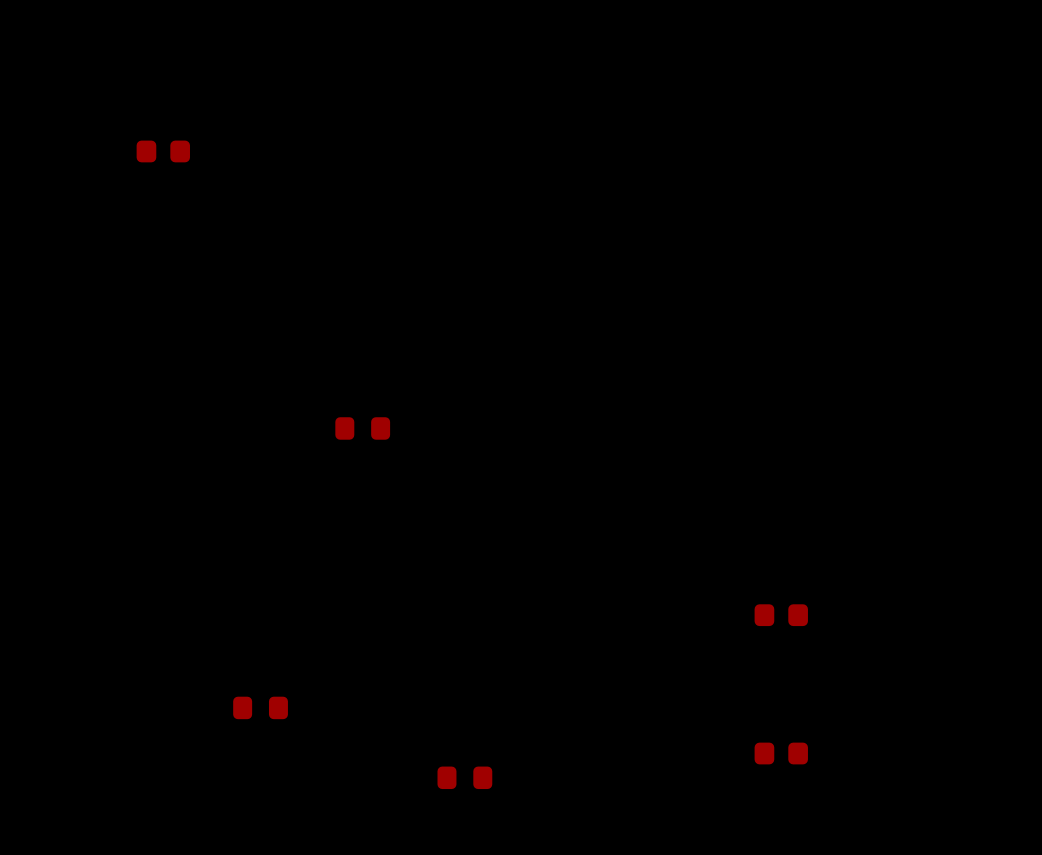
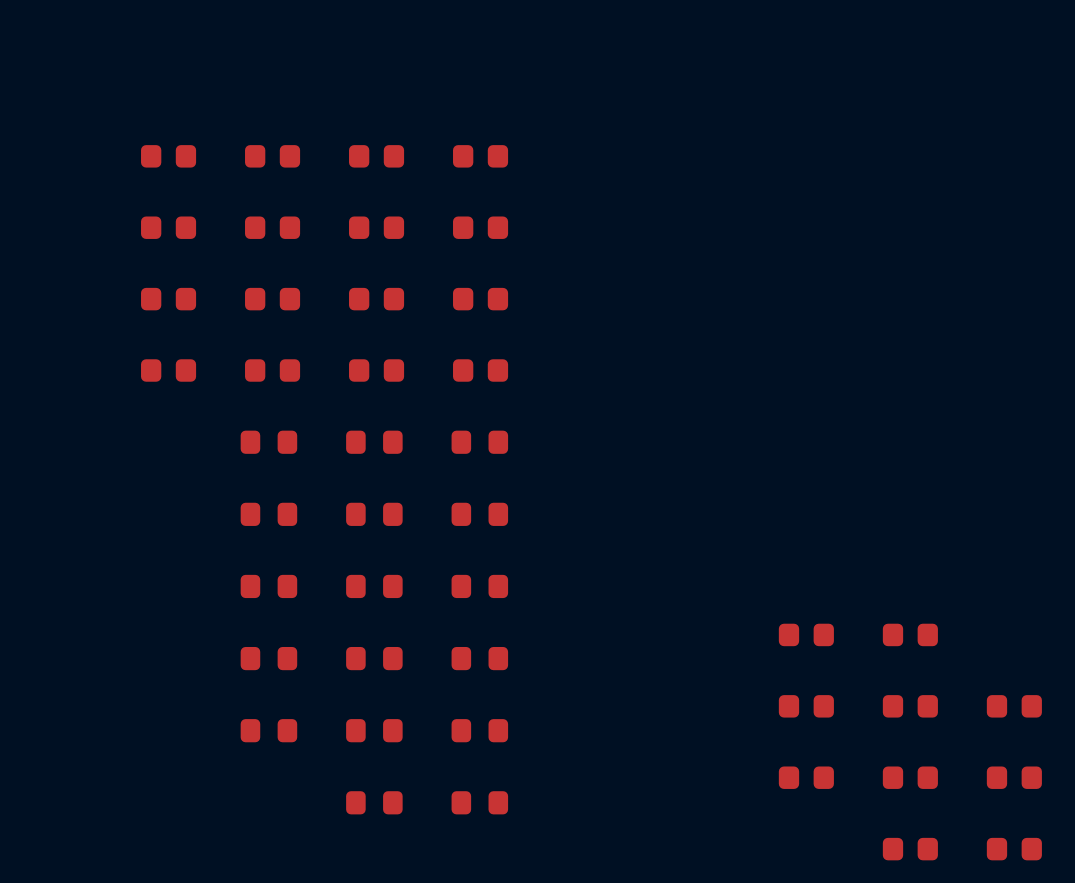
part: none -> (272, 156)
part: none -> (376, 156)
part: none -> (480, 156)
part: none -> (168, 227)
part: none -> (272, 227)
part: none -> (376, 227)
part: none -> (480, 227)
part: none -> (168, 299)
part: none -> (272, 299)
part: none -> (376, 299)
part: none -> (480, 299)
part: none -> (168, 370)
part: none -> (272, 370)
part: none -> (376, 370)
part: none -> (480, 370)
part: none -> (268, 442)
part: none -> (479, 442)
part: none -> (268, 514)
part: none -> (374, 514)
part: none -> (479, 514)
part: none -> (268, 586)
part: none -> (374, 586)
part: none -> (479, 586)
part: none -> (910, 634)
part: none -> (268, 658)
part: none -> (374, 658)
part: none -> (479, 658)
part: none -> (806, 706)
part: none -> (910, 706)
part: none -> (1014, 706)
part: none -> (374, 730)
part: none -> (479, 730)
part: none -> (910, 777)
part: none -> (1014, 777)
part: none -> (374, 802)
part: none -> (910, 849)
part: none -> (1014, 849)

